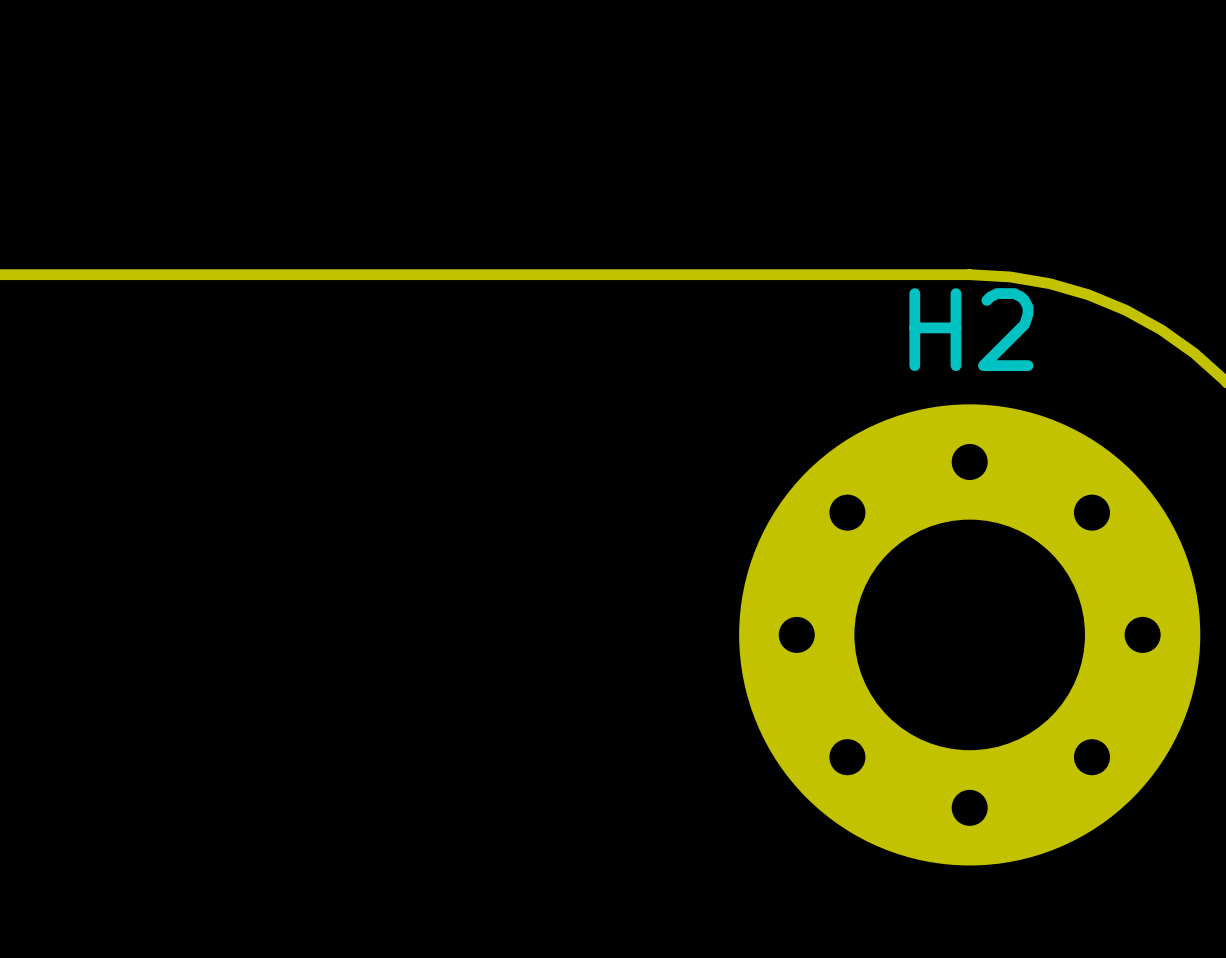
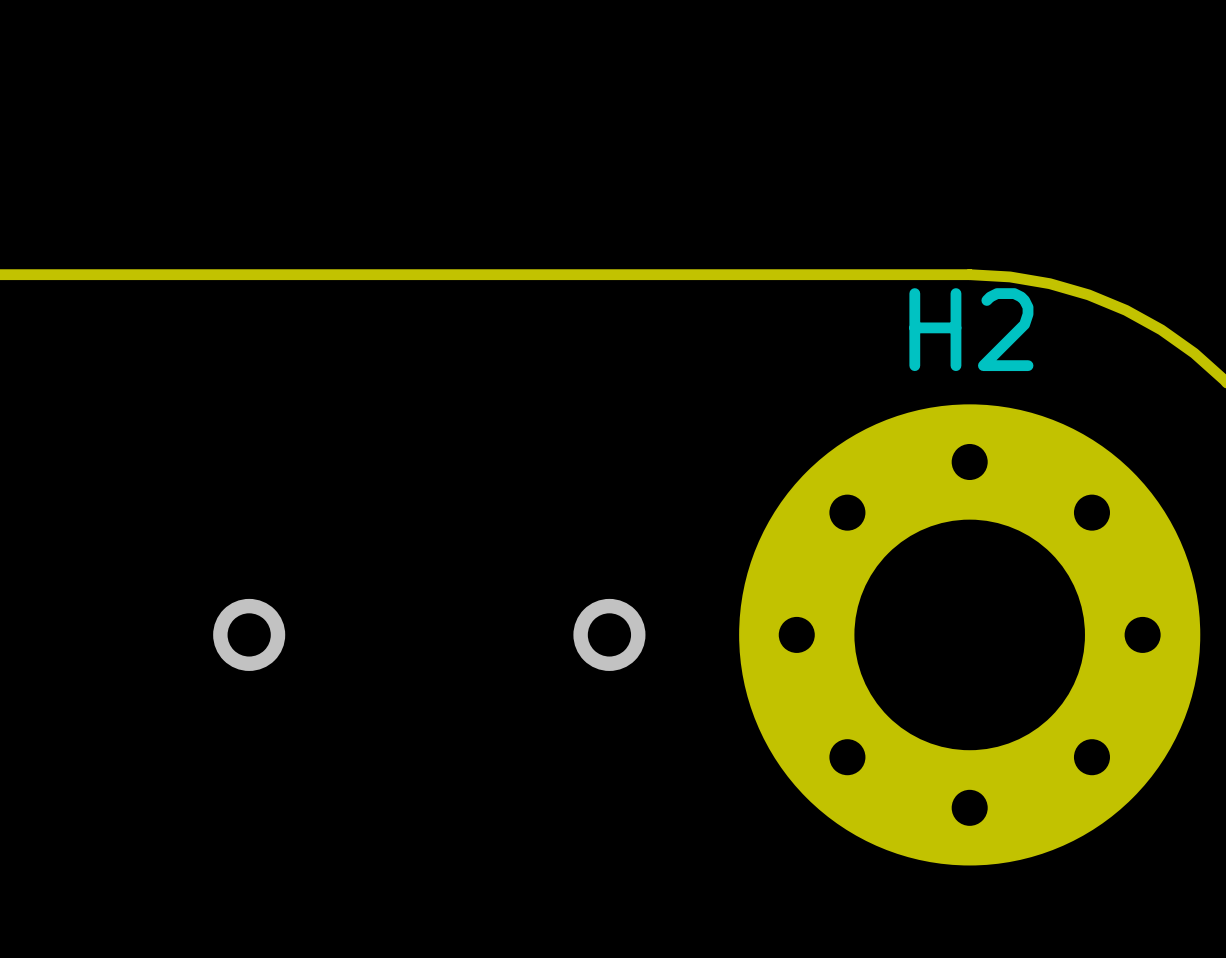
via: none -> (249, 634)
via: none -> (609, 634)

